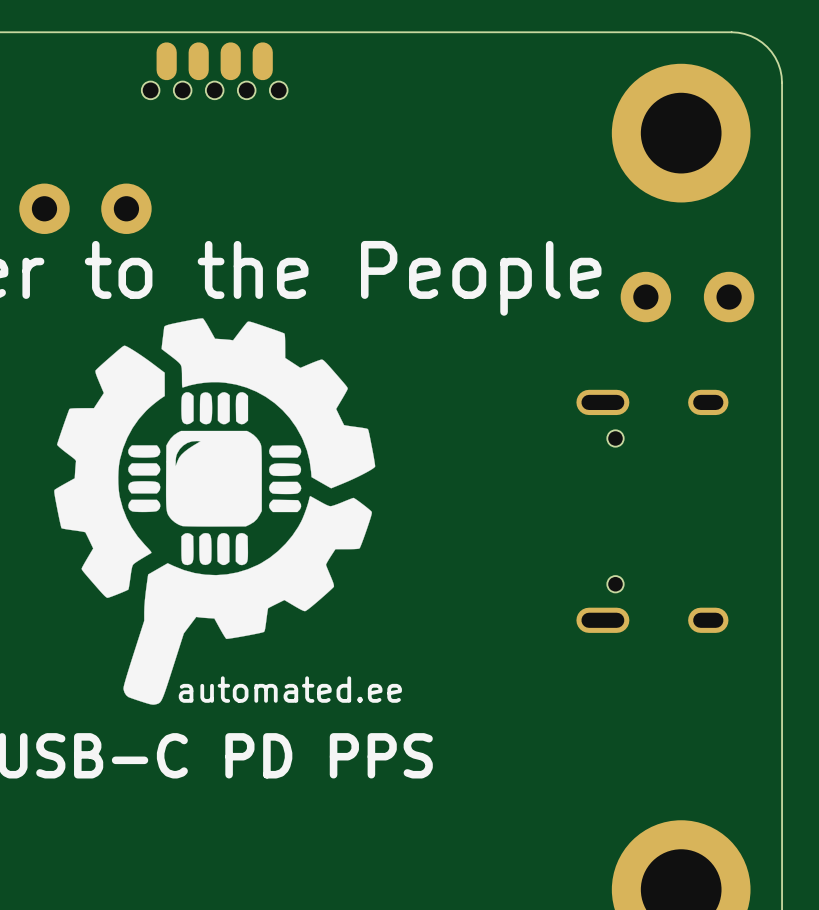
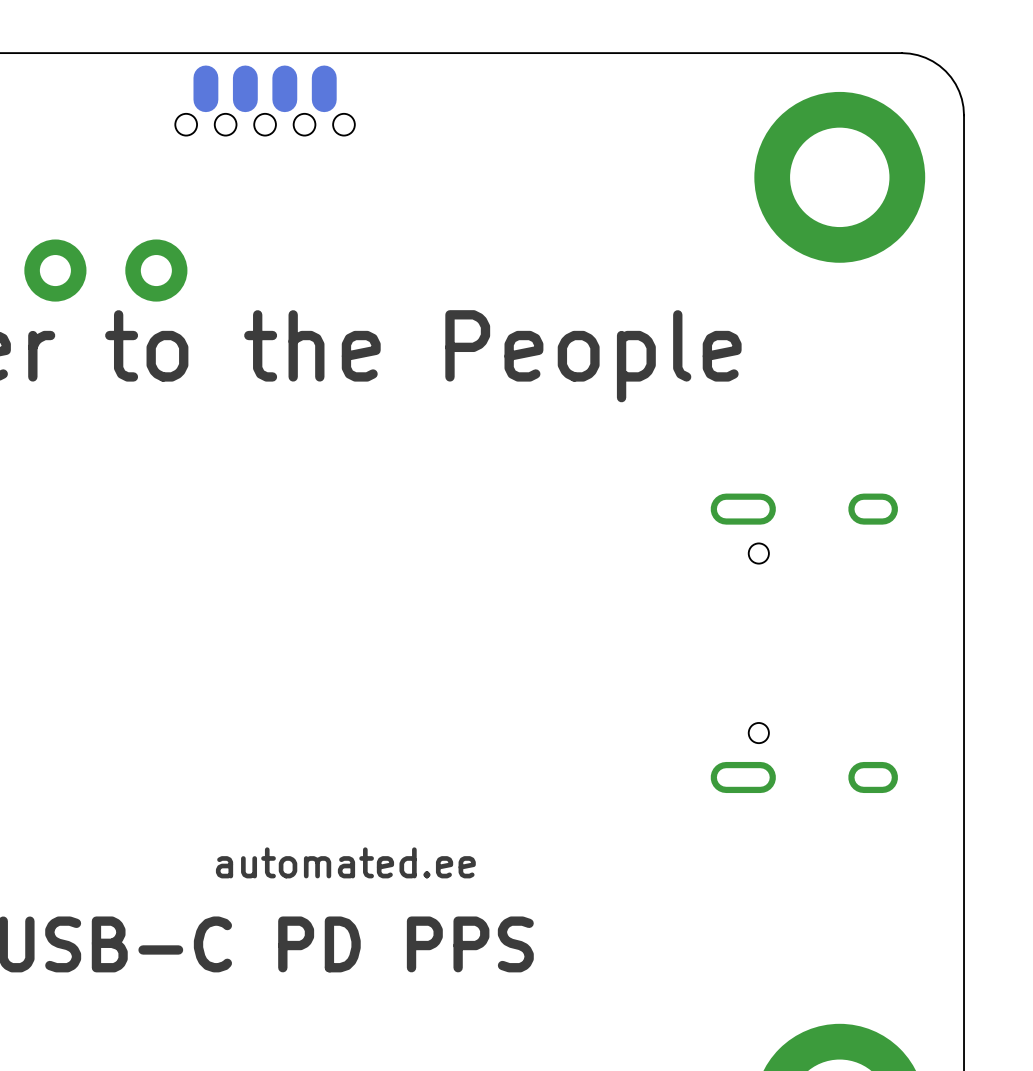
part: (645, 297) -> none
part: (729, 297) -> none
drawing: [54, 318, 376, 705] -> none
drawing: none -> [215, 847, 476, 879]
text: automated.ee (290, 689) -> none

